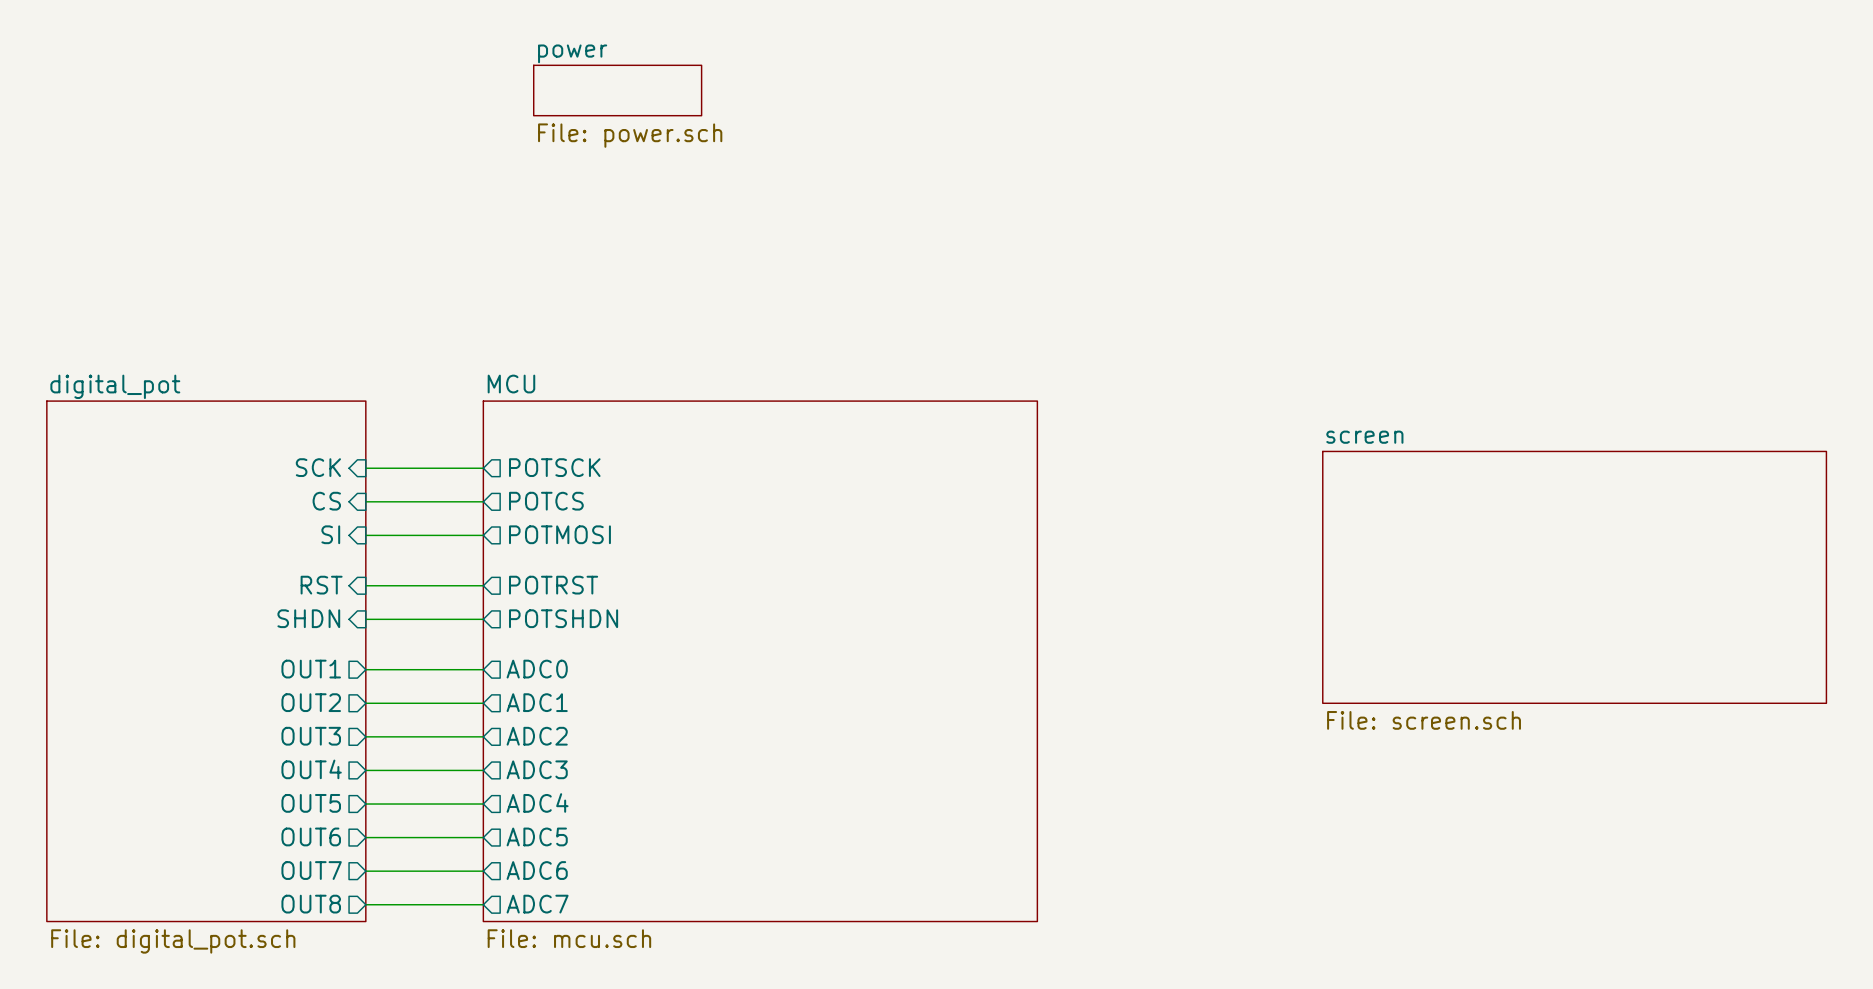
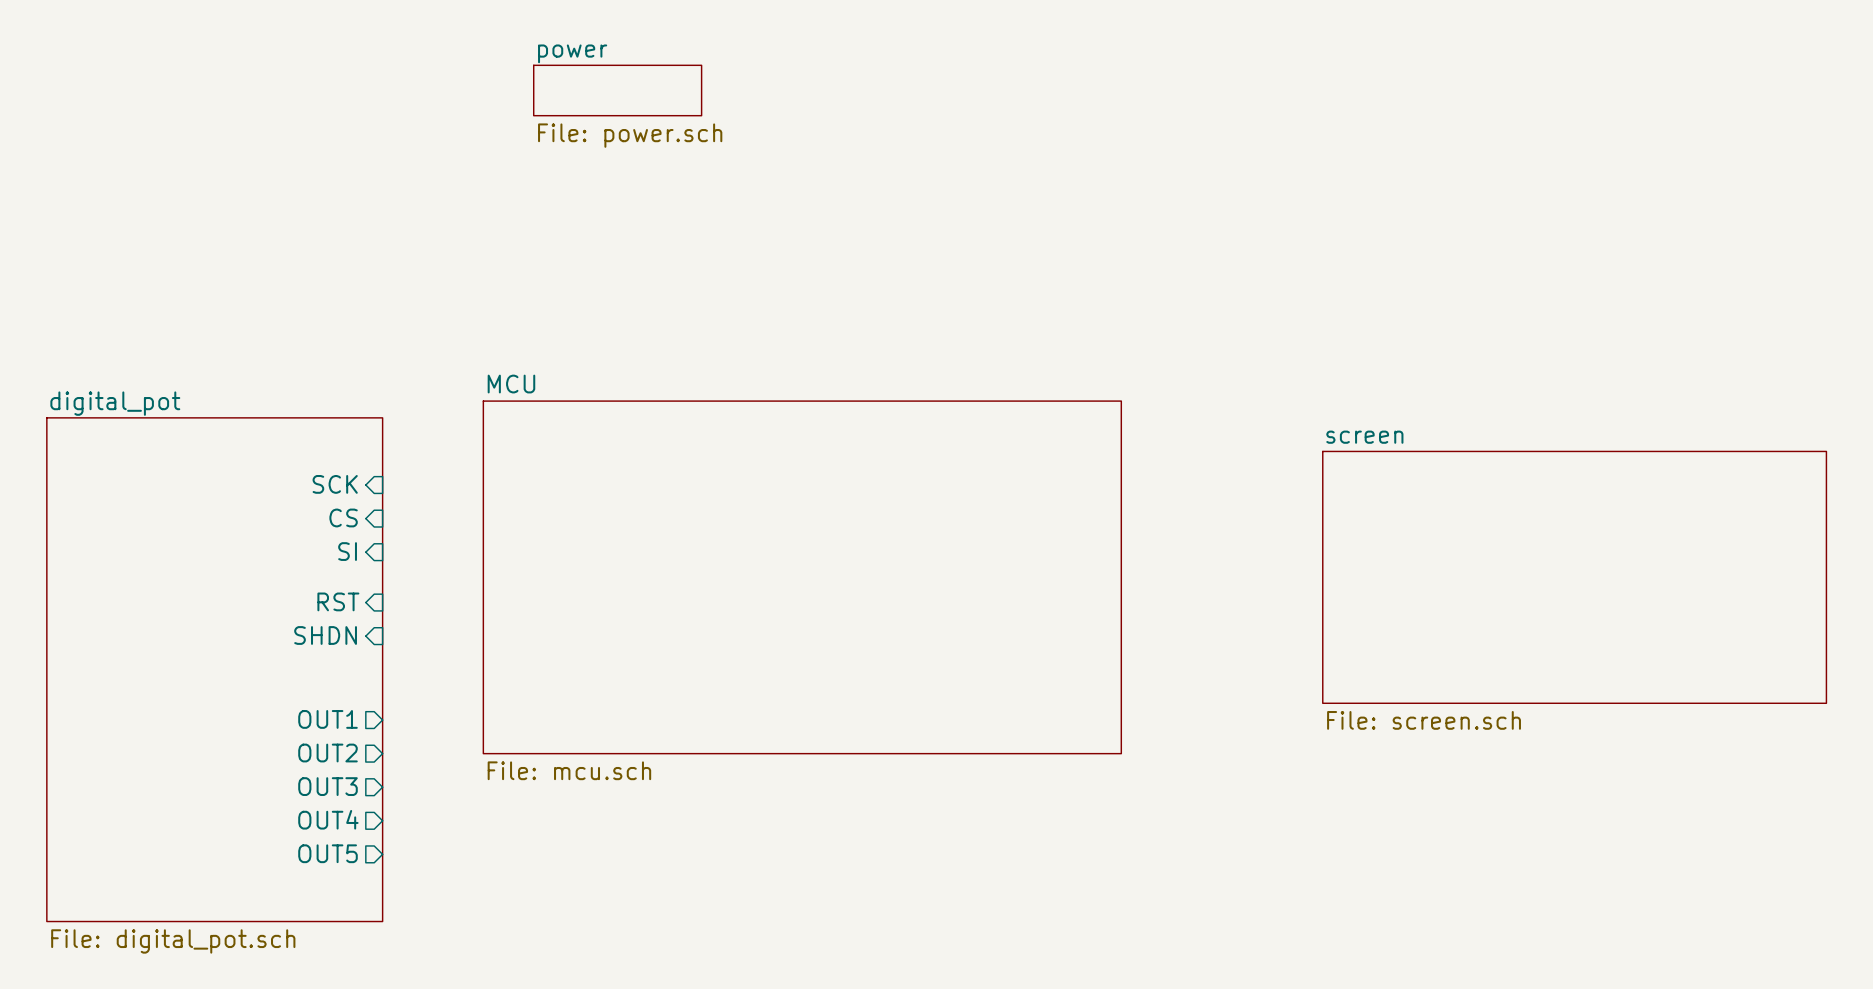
sheet digital_pot shape: [46, 401, 366, 922] -> [46, 417, 383, 922]
sheet pin position: SCK (318, 467) -> SCK (335, 484)
sheet pin: POTSCK (554, 467) -> none
wire: (365, 468) (483, 468) -> none
sheet pin position: CS (326, 501) -> CS (343, 517)
wire: (365, 501) (483, 501) -> none
sheet pin: POTCS (546, 501) -> none
sheet pin position: SI (330, 534) -> SI (347, 551)
sheet pin: POTMOSI (559, 534) -> none
wire: (365, 535) (483, 535) -> none
sheet MCU: none -> File: mcu.sch (802, 577)
sheet pin position: RST (321, 585) -> RST (338, 601)
wire: (365, 585) (483, 585) -> none
sheet pin: POTRST (553, 585) -> none
sheet pin position: SHDN (308, 618) -> SHDN (325, 635)
sheet pin: POTSHDN (563, 618) -> none
wire: (365, 619) (483, 619) -> none
sheet MCU: File: mcu.sch (760, 661) -> none
sheet pin position: OUT1 (311, 669) -> OUT1 (327, 719)
wire: (365, 669) (483, 669) -> none
sheet pin: ADC0 (537, 669) -> none
sheet pin position: OUT2 (311, 702) -> OUT2 (327, 753)
sheet pin: ADC1 (537, 702) -> none
wire: (365, 703) (483, 703) -> none
sheet pin position: OUT3 (311, 736) -> OUT3 (327, 786)
wire: (365, 736) (483, 736) -> none
sheet pin: ADC2 (537, 736) -> none
sheet pin position: OUT4 (311, 769) -> OUT4 (328, 819)
sheet pin: ADC3 (537, 769) -> none
wire: (365, 770) (483, 770) -> none
sheet pin: ADC4 (537, 802) -> none
sheet pin position: OUT5 (311, 803) -> OUT5 (327, 853)
wire: (365, 804) (483, 804) -> none
sheet pin: OUT6 (311, 836) -> none
sheet pin: ADC5 (537, 836) -> none
wire: (365, 837) (483, 837) -> none
sheet pin: OUT7 (311, 870) -> none
sheet pin: ADC6 (537, 870) -> none
wire: (365, 871) (483, 871) -> none
sheet pin: OUT8 (311, 904) -> none
wire: (365, 904) (483, 904) -> none
sheet pin: ADC7 (537, 904) -> none

